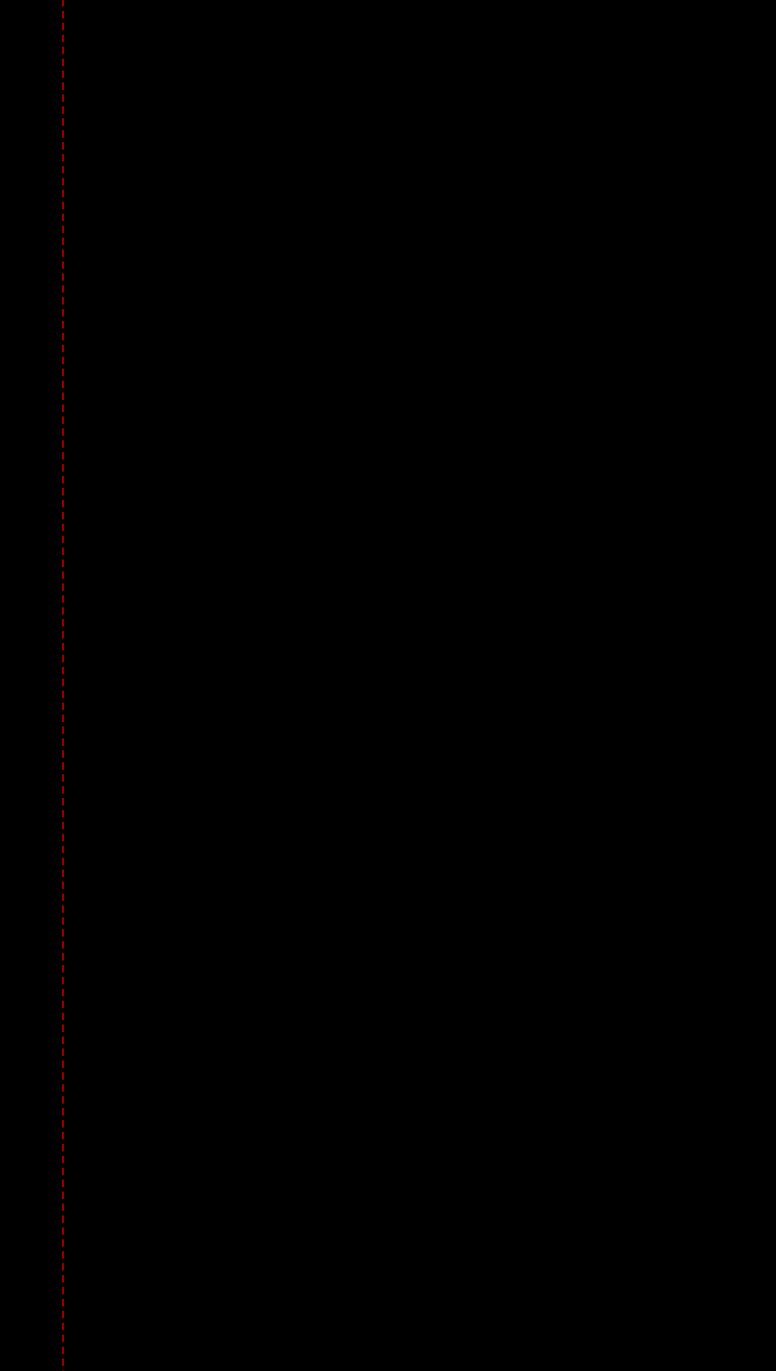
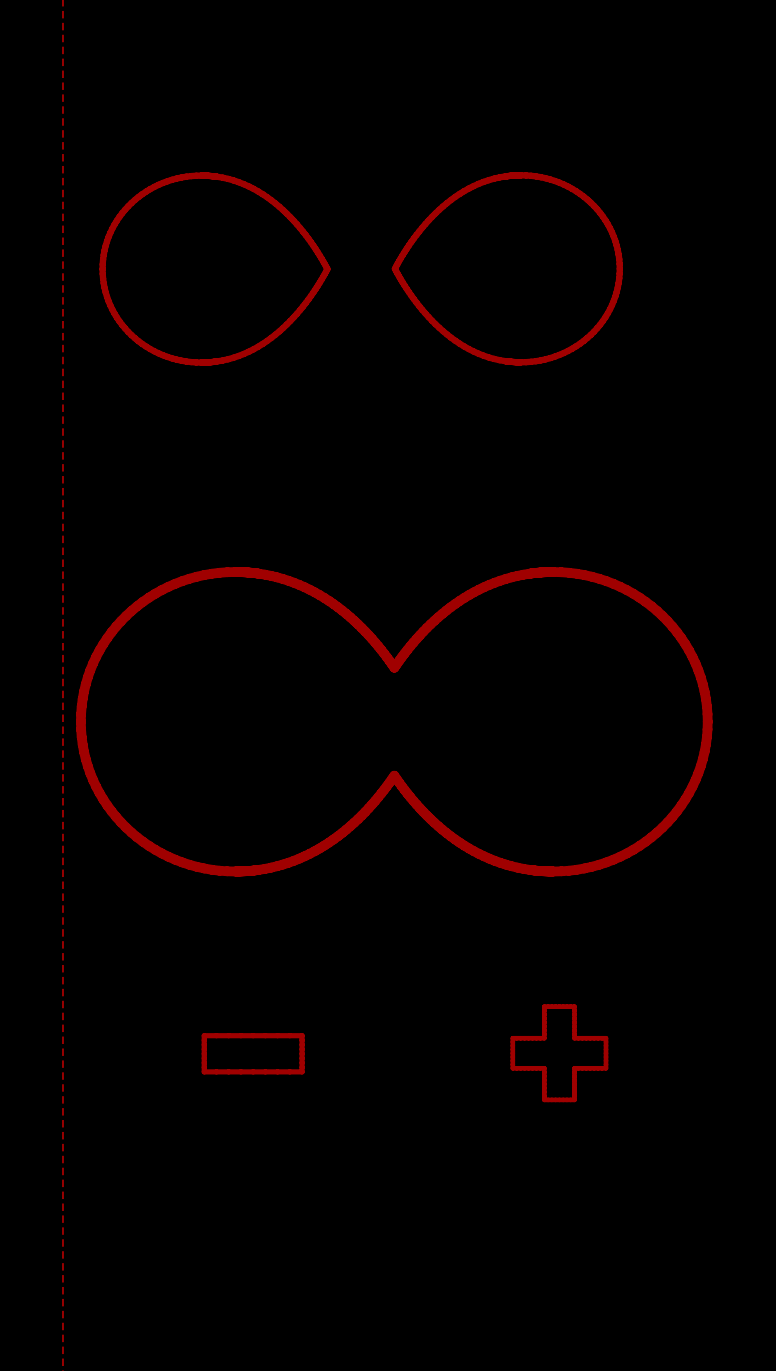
drawing: none -> [99, 172, 623, 366]
drawing: none -> [76, 567, 713, 877]
drawing: none -> [201, 1004, 609, 1103]

